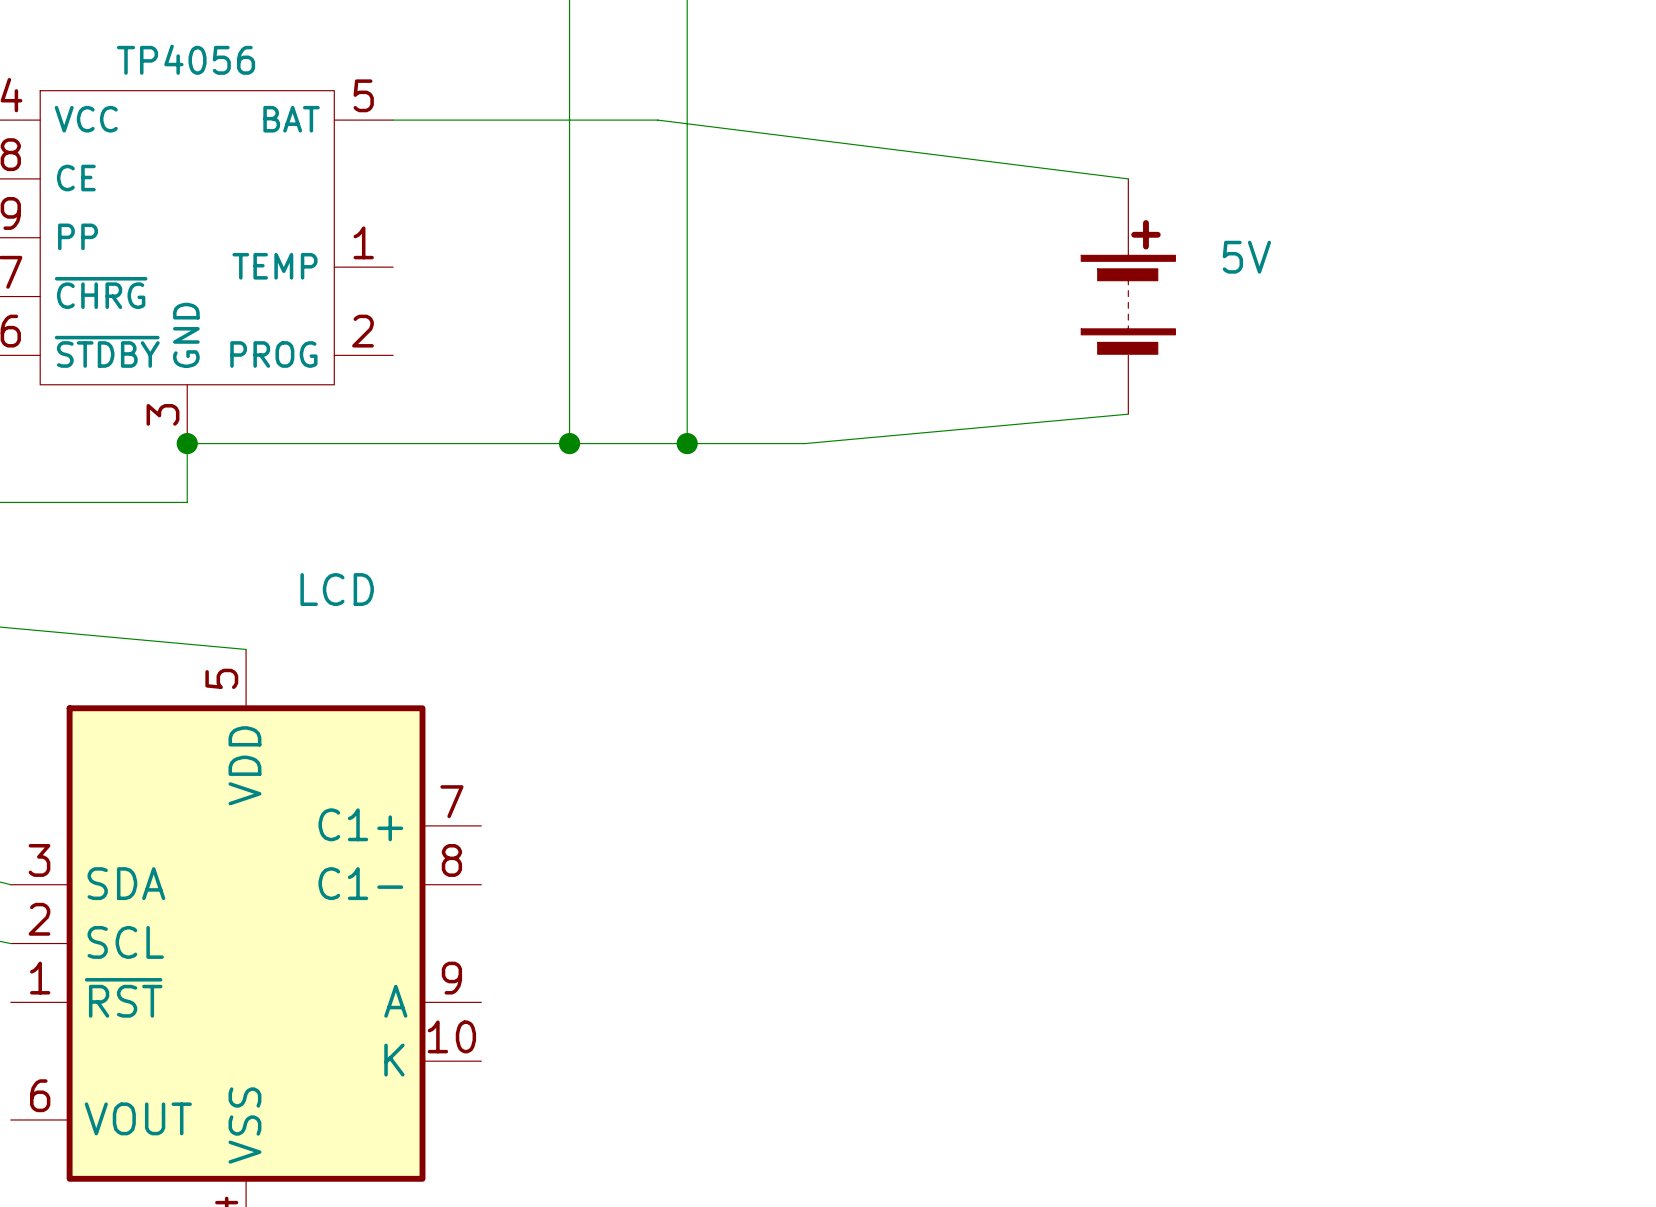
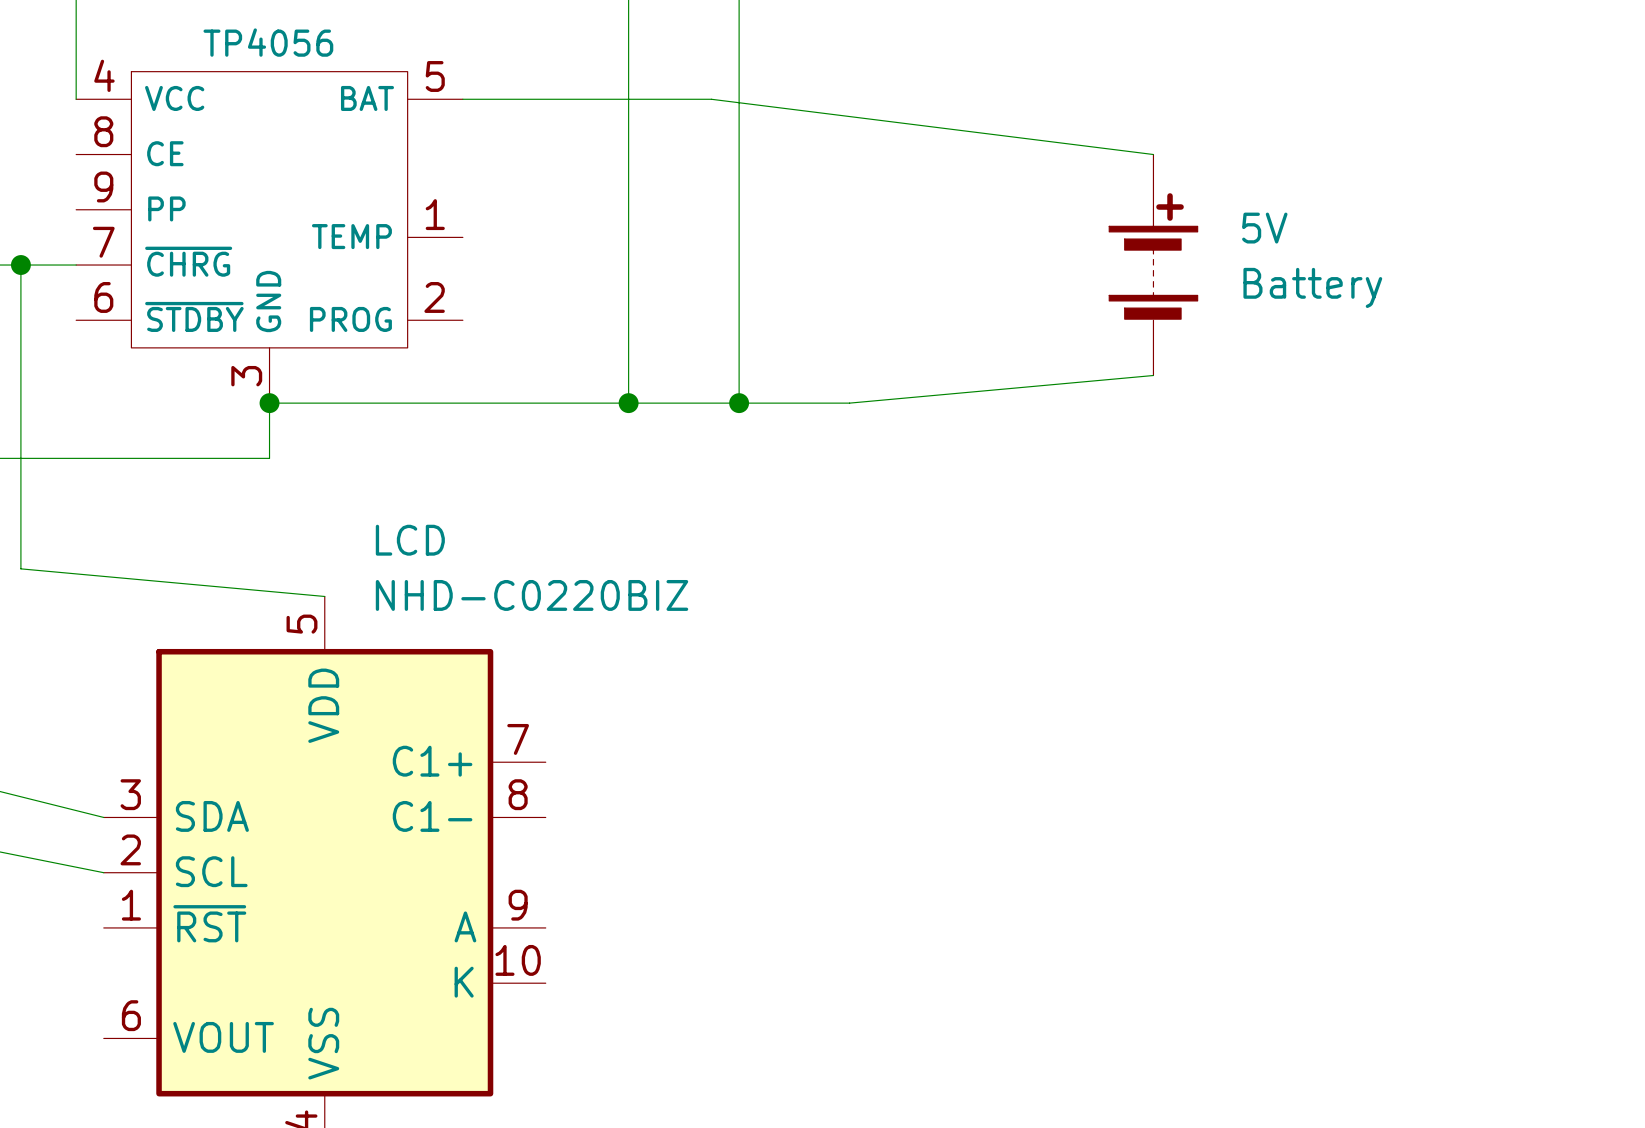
5V value: none -> Battery (1312, 287)
LCD value: none -> NHD-C0220BIZ (532, 595)

